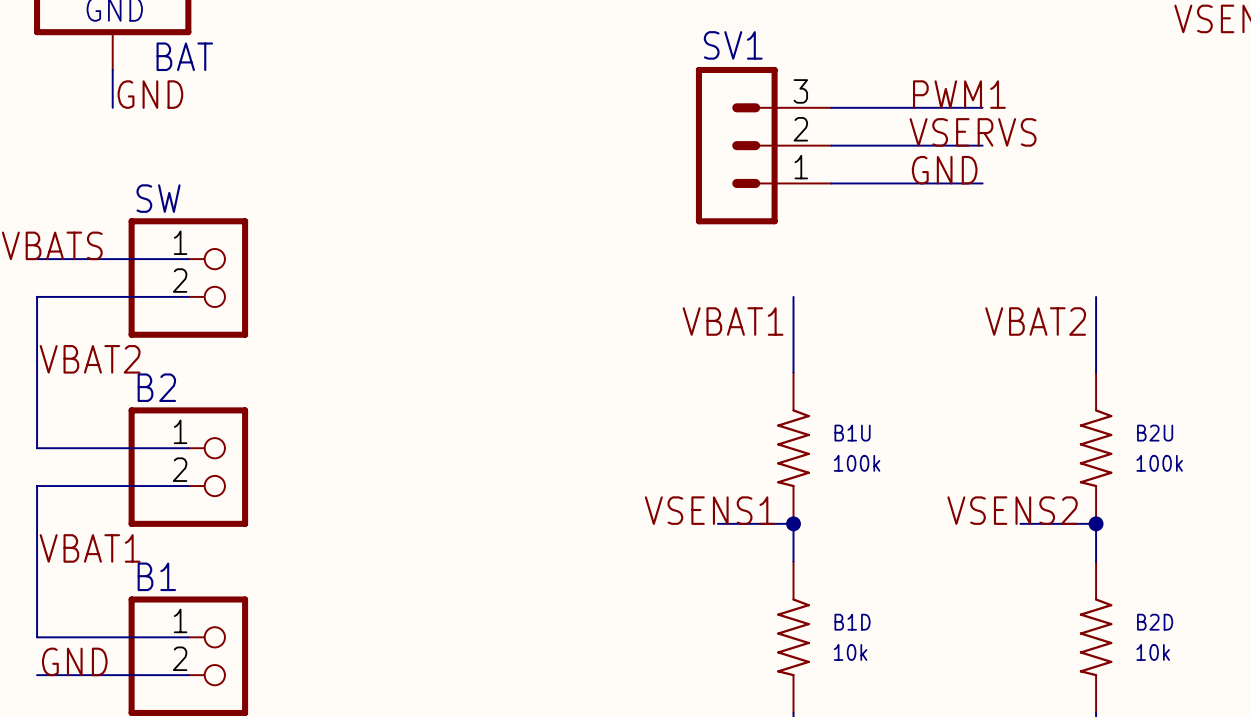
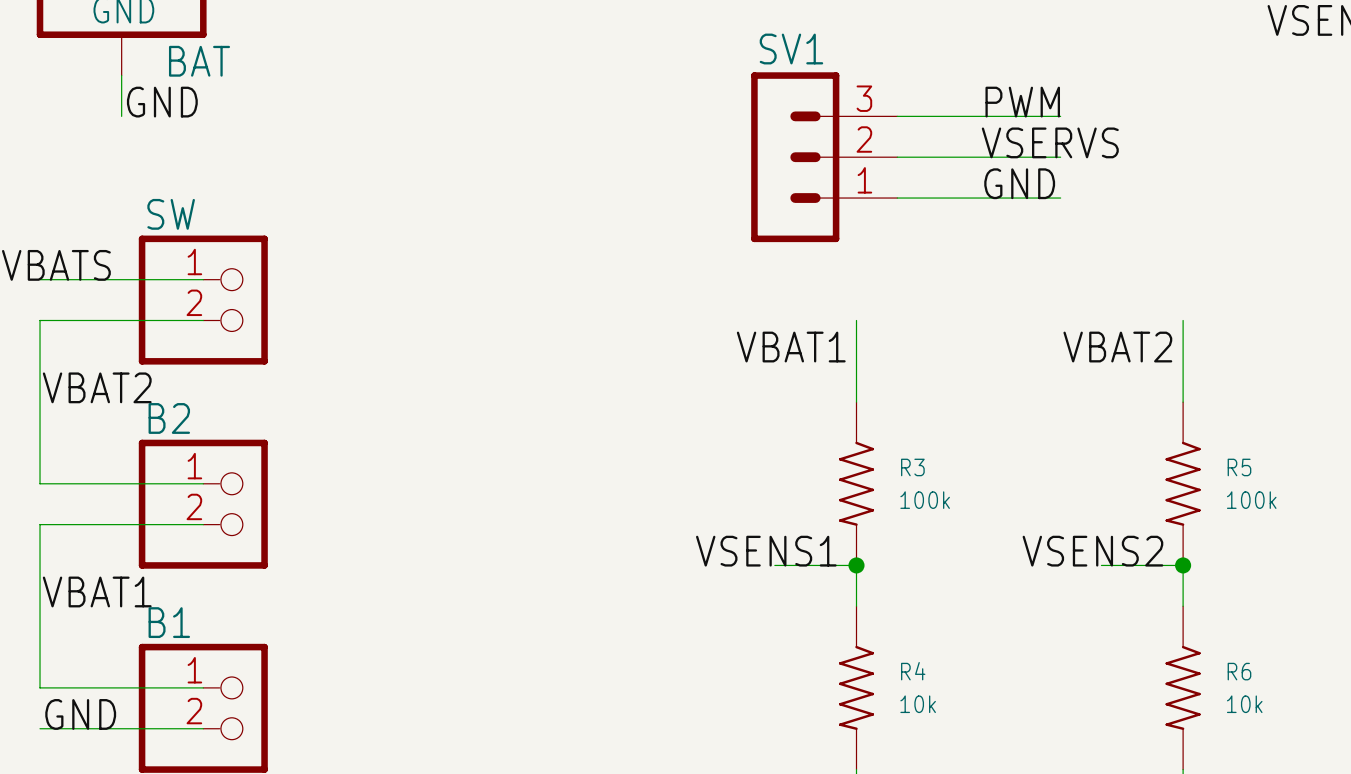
label: PWM1 (959, 94) -> PWM (1022, 102)
B1U name: B1U (852, 433) -> R3 (912, 467)
B2U name: B2U (1155, 433) -> R5 (1239, 467)
B1D name: B1D (852, 622) -> R4 (913, 671)
B2D name: B2D (1155, 622) -> R6 (1239, 671)

